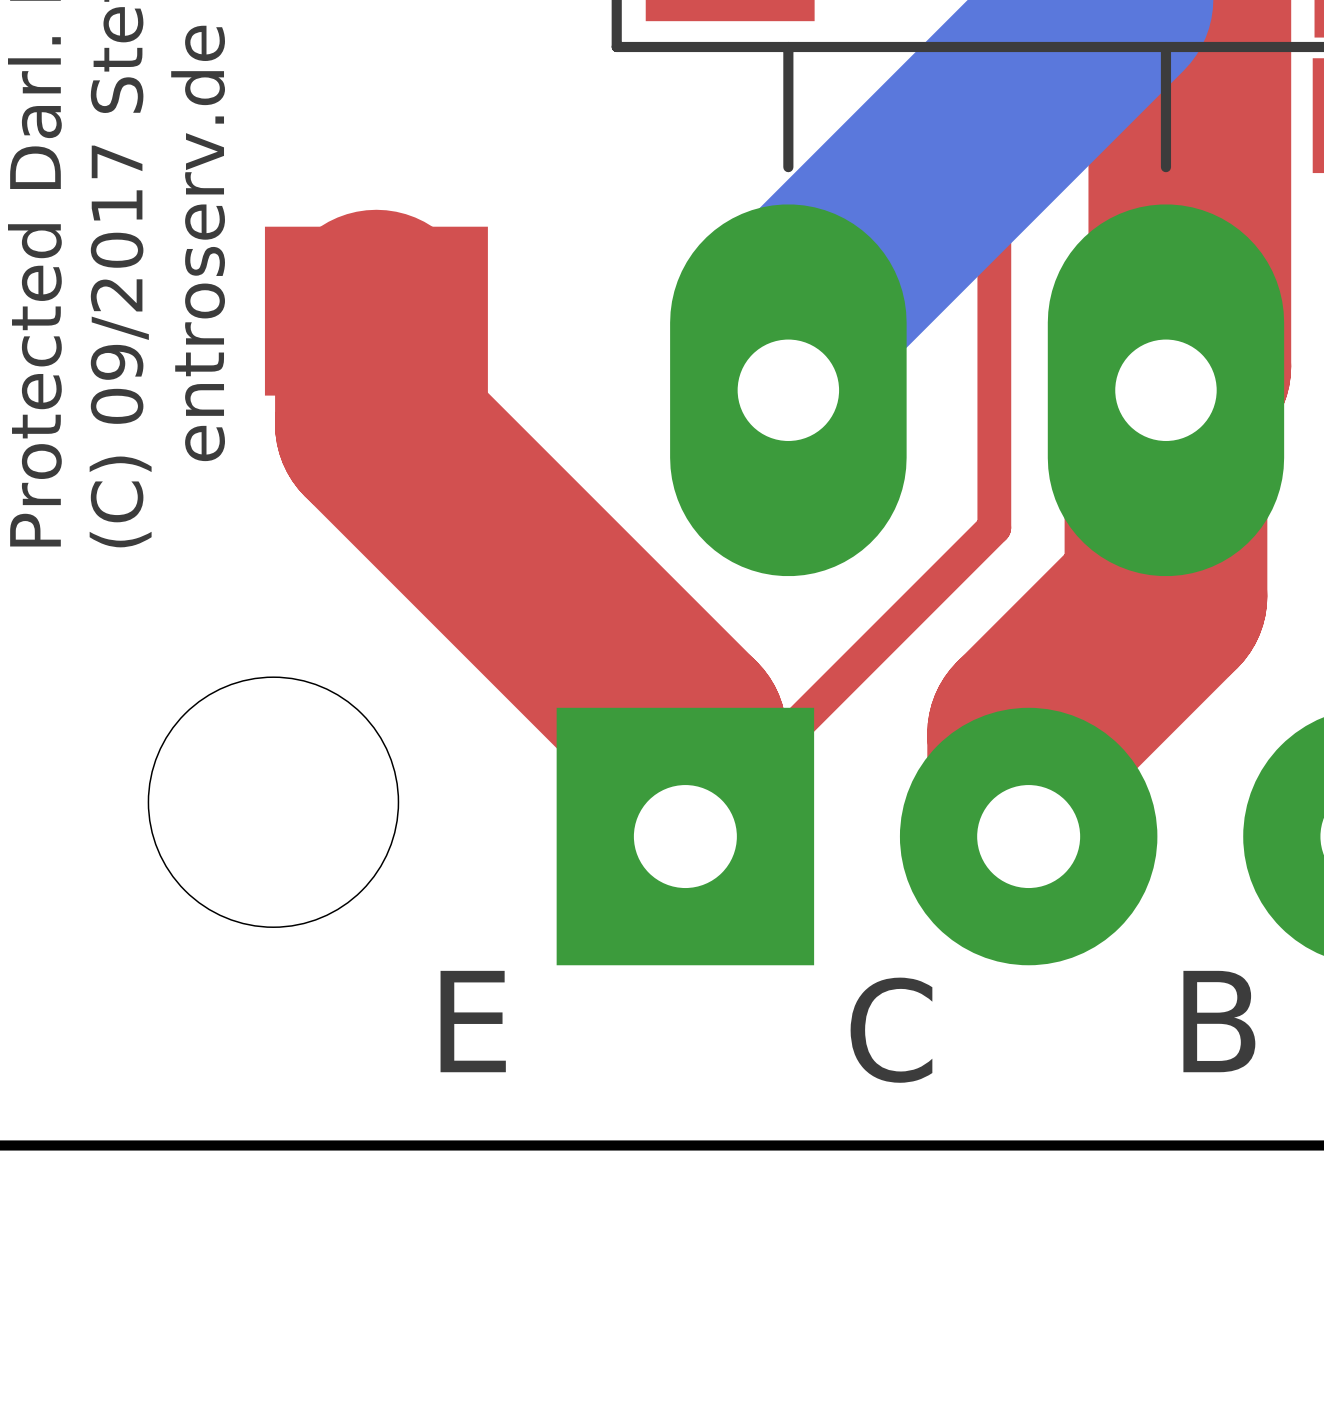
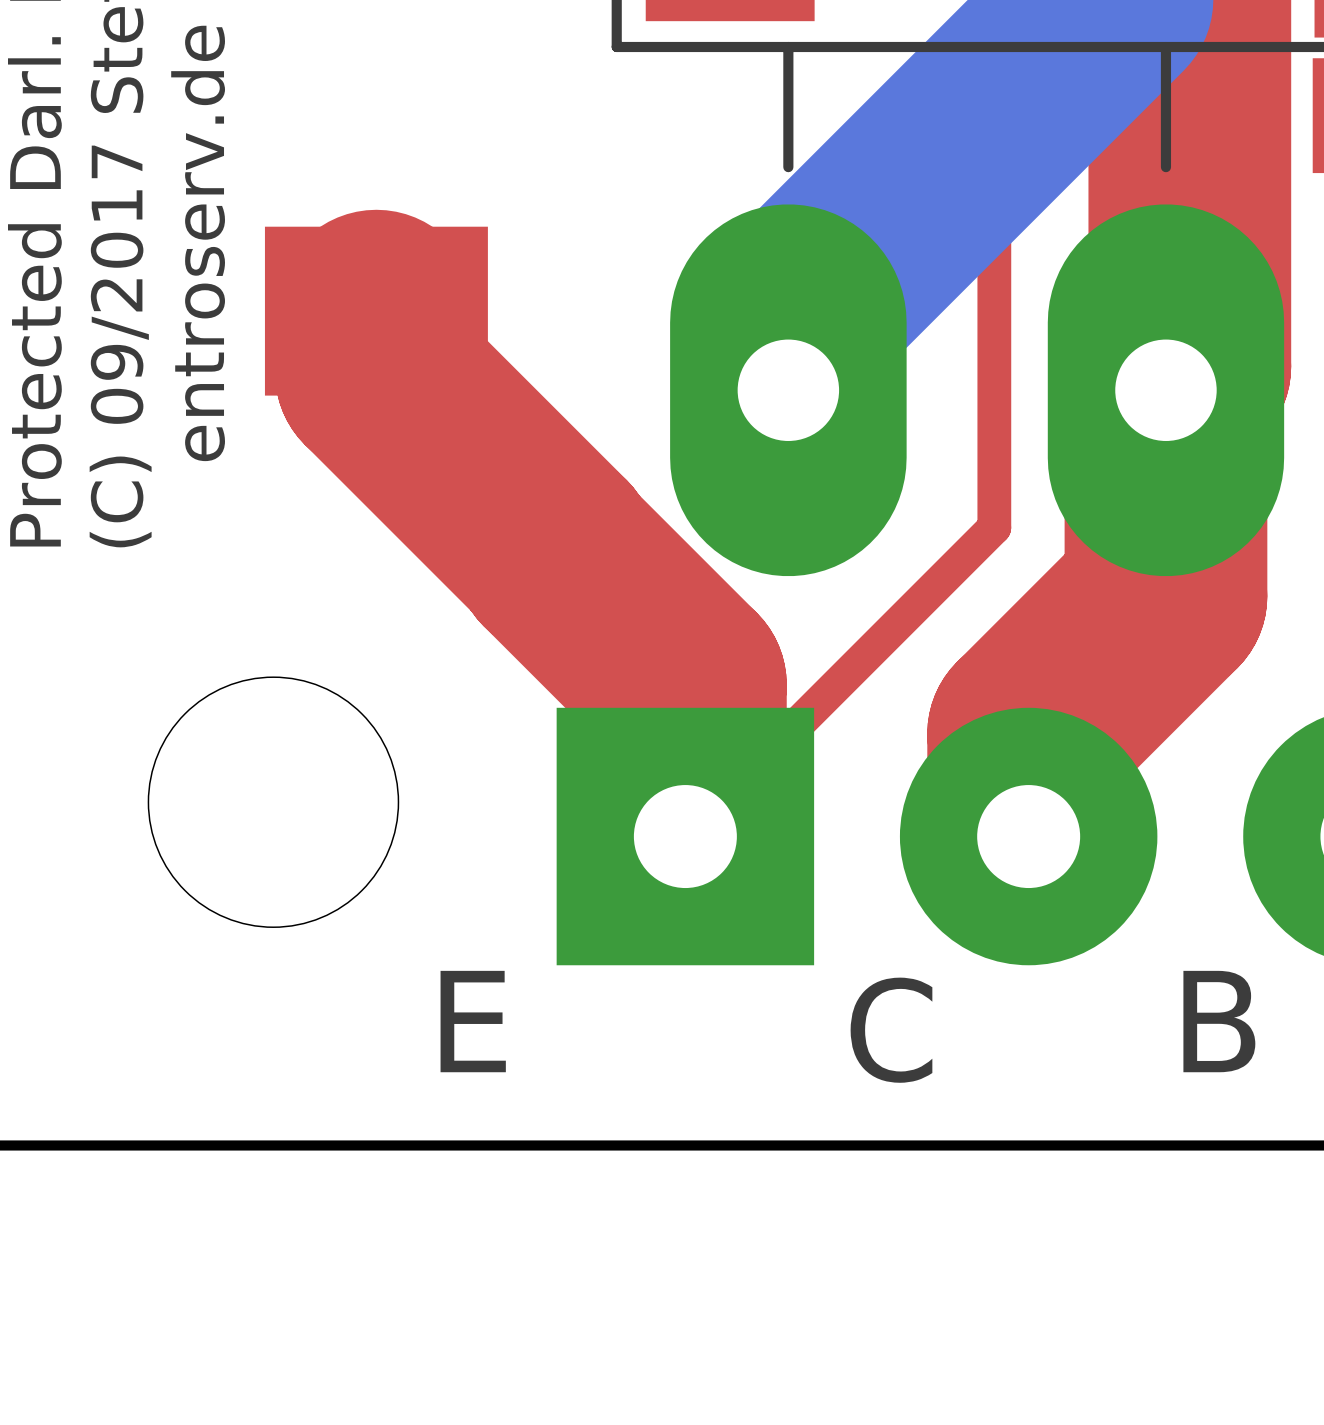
top track: (376, 373) (376, 424) (685, 733) -> (376, 373) (685, 684) (685, 733)

